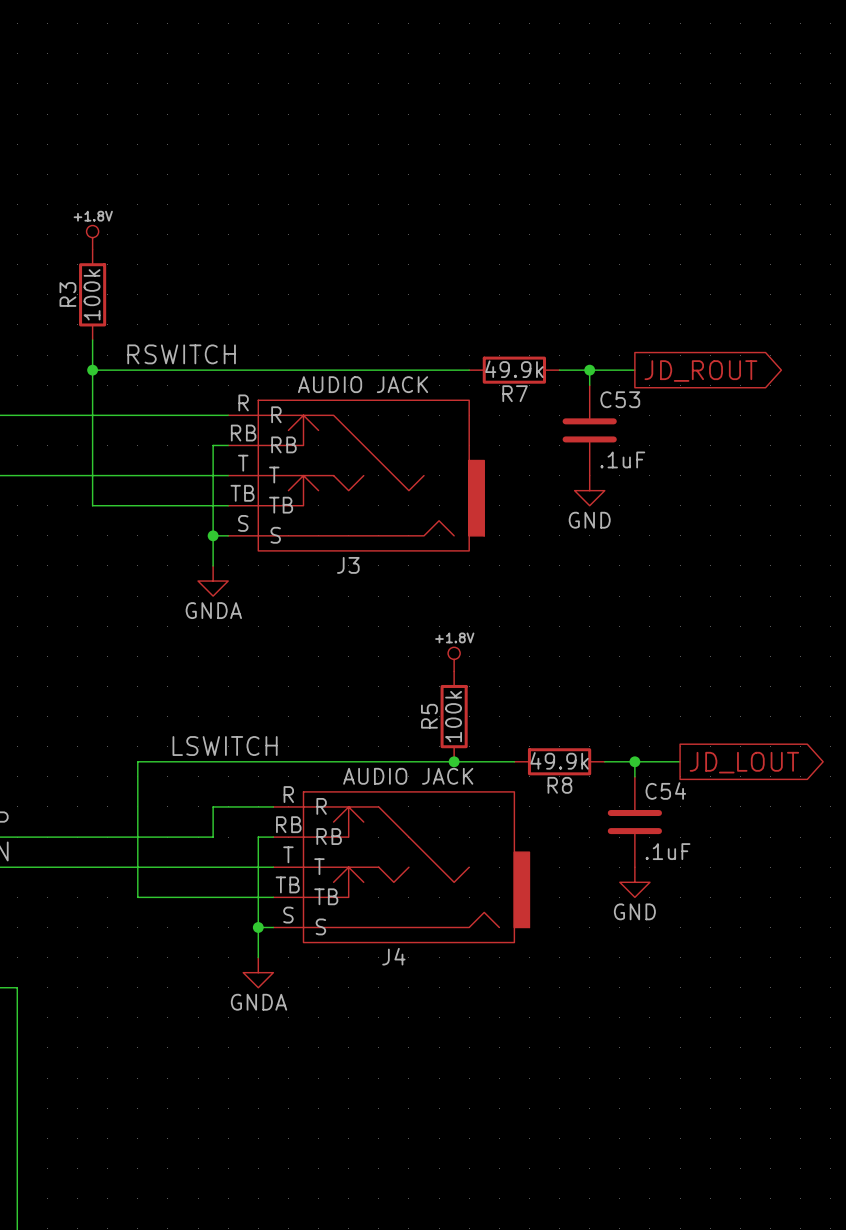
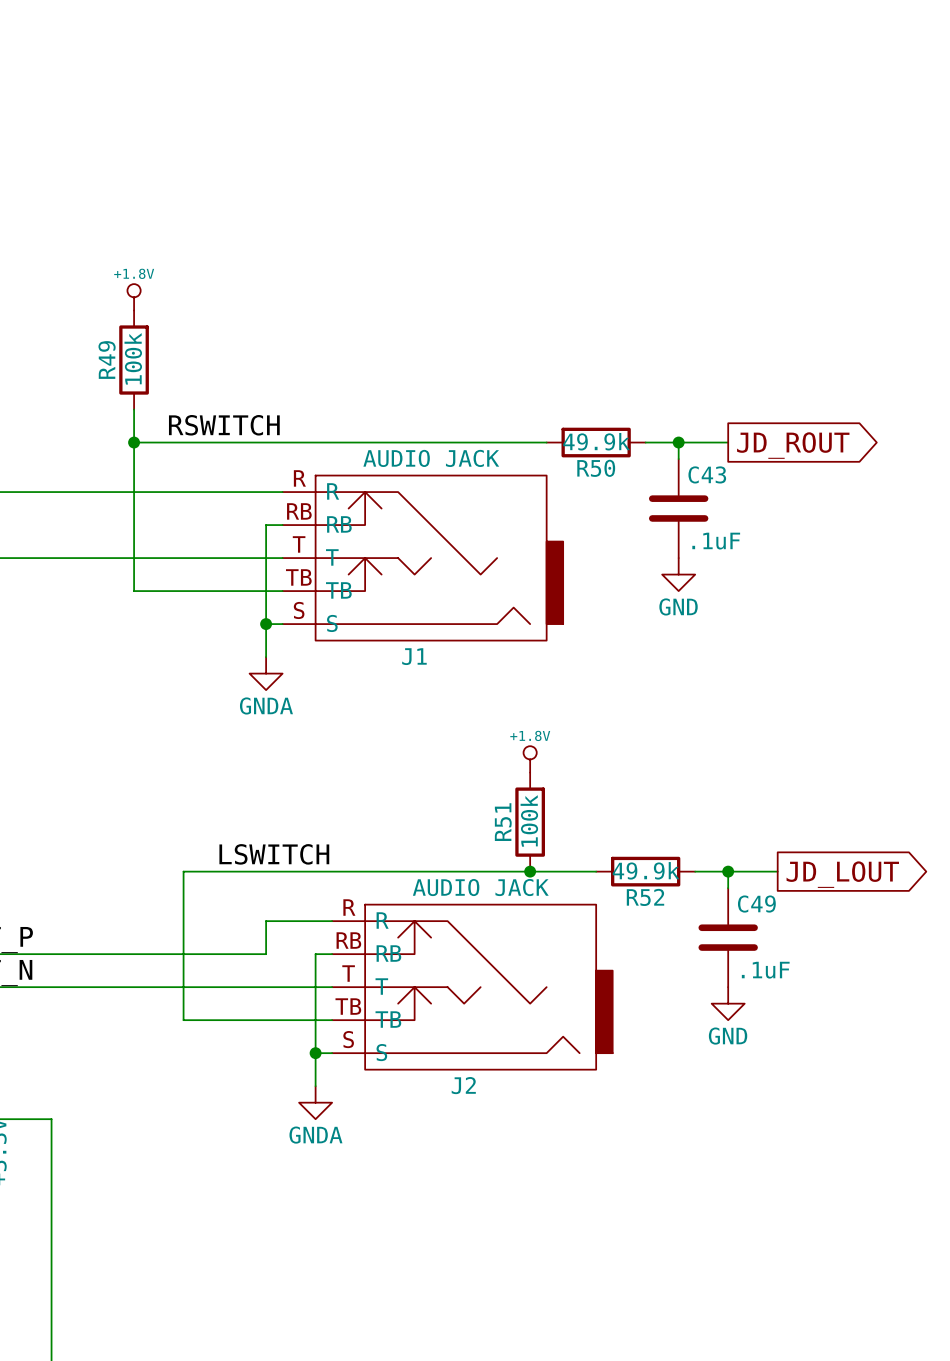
R3 name: R3 (67, 294) -> R49 (107, 360)
R7 name: R7 (515, 393) -> R50 (596, 468)
C53 name: C53 (620, 399) -> C43 (707, 474)
J3 name: J3 (348, 565) -> J1 (414, 656)
R5 name: R5 (429, 716) -> R51 (503, 822)
R8 name: R8 (559, 785) -> R52 (645, 897)
C54 name: C54 (665, 790) -> C49 (756, 904)
J4 name: J4 (393, 956) -> J2 (463, 1085)

